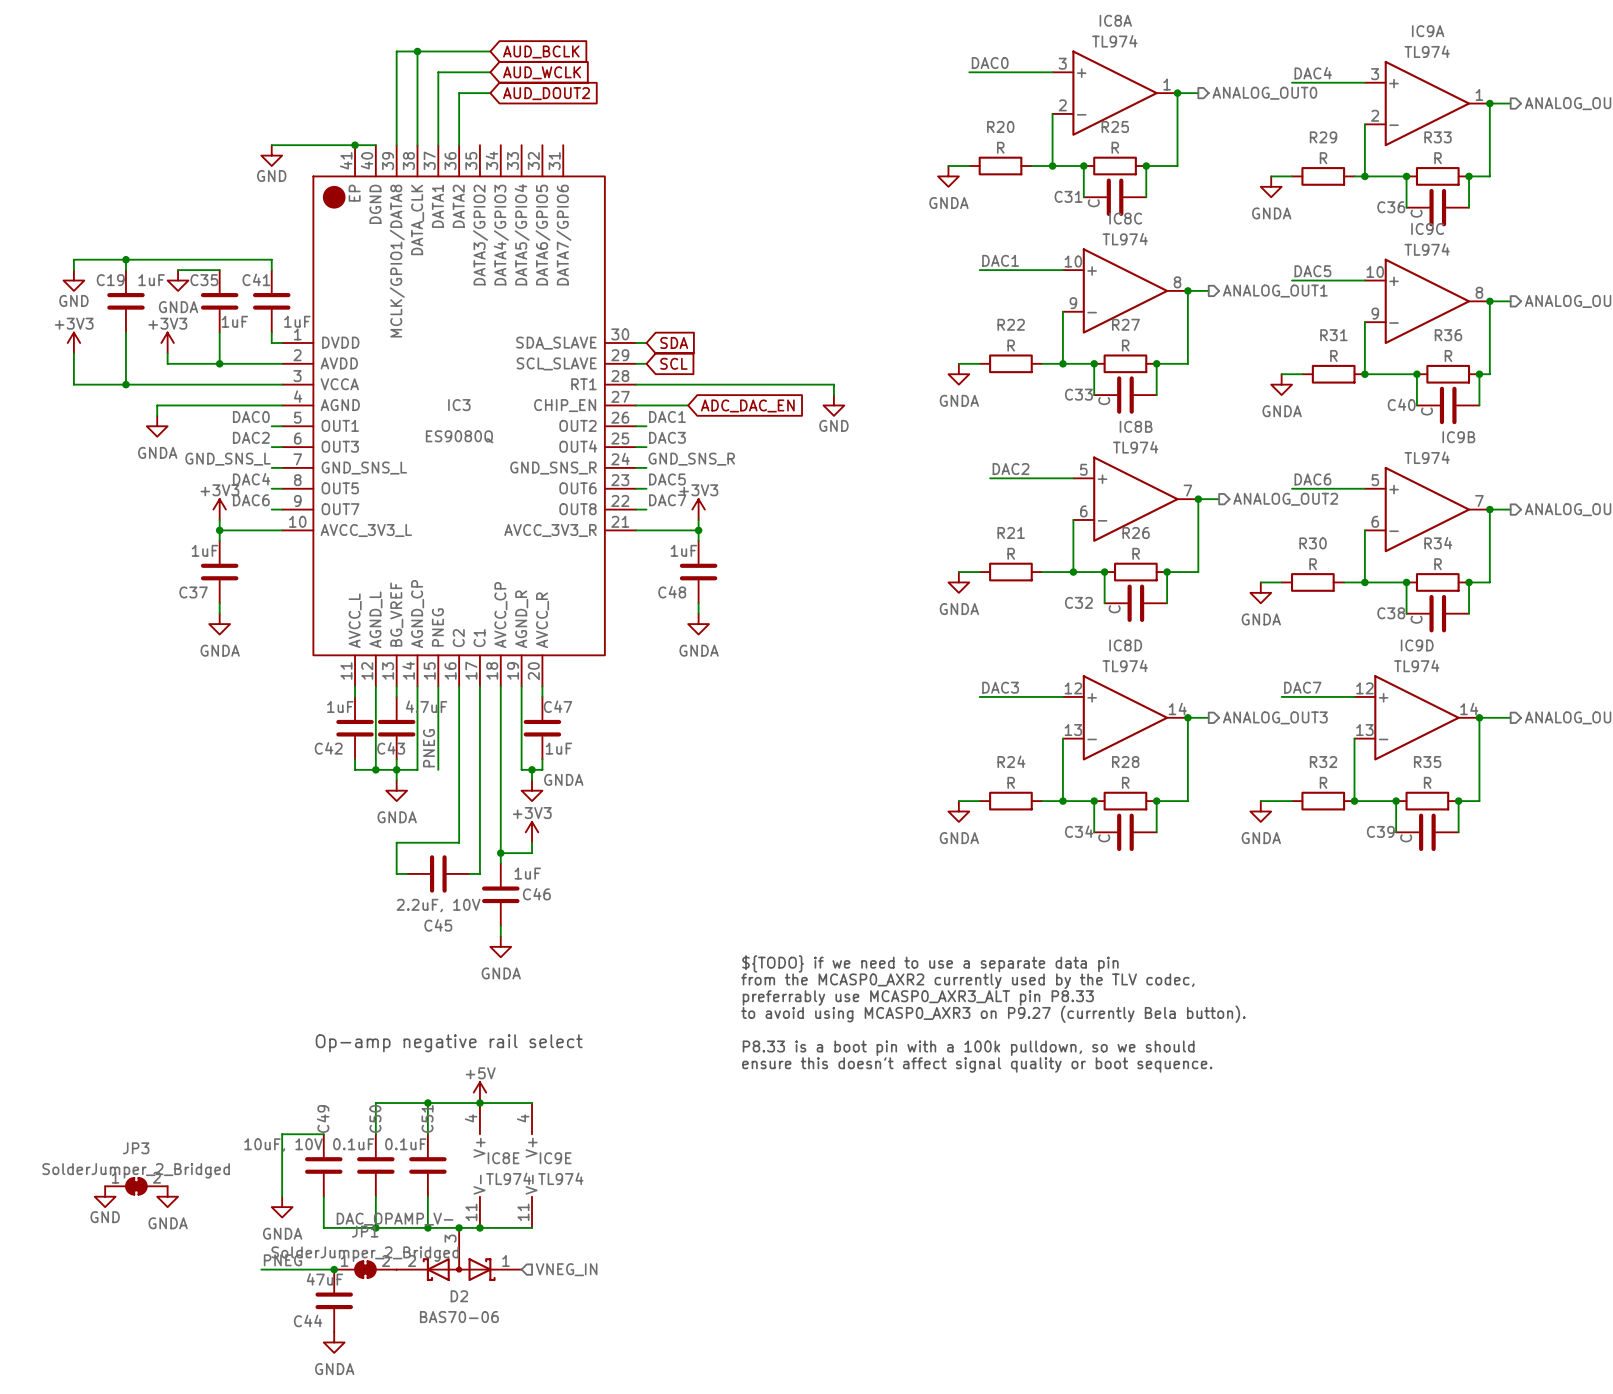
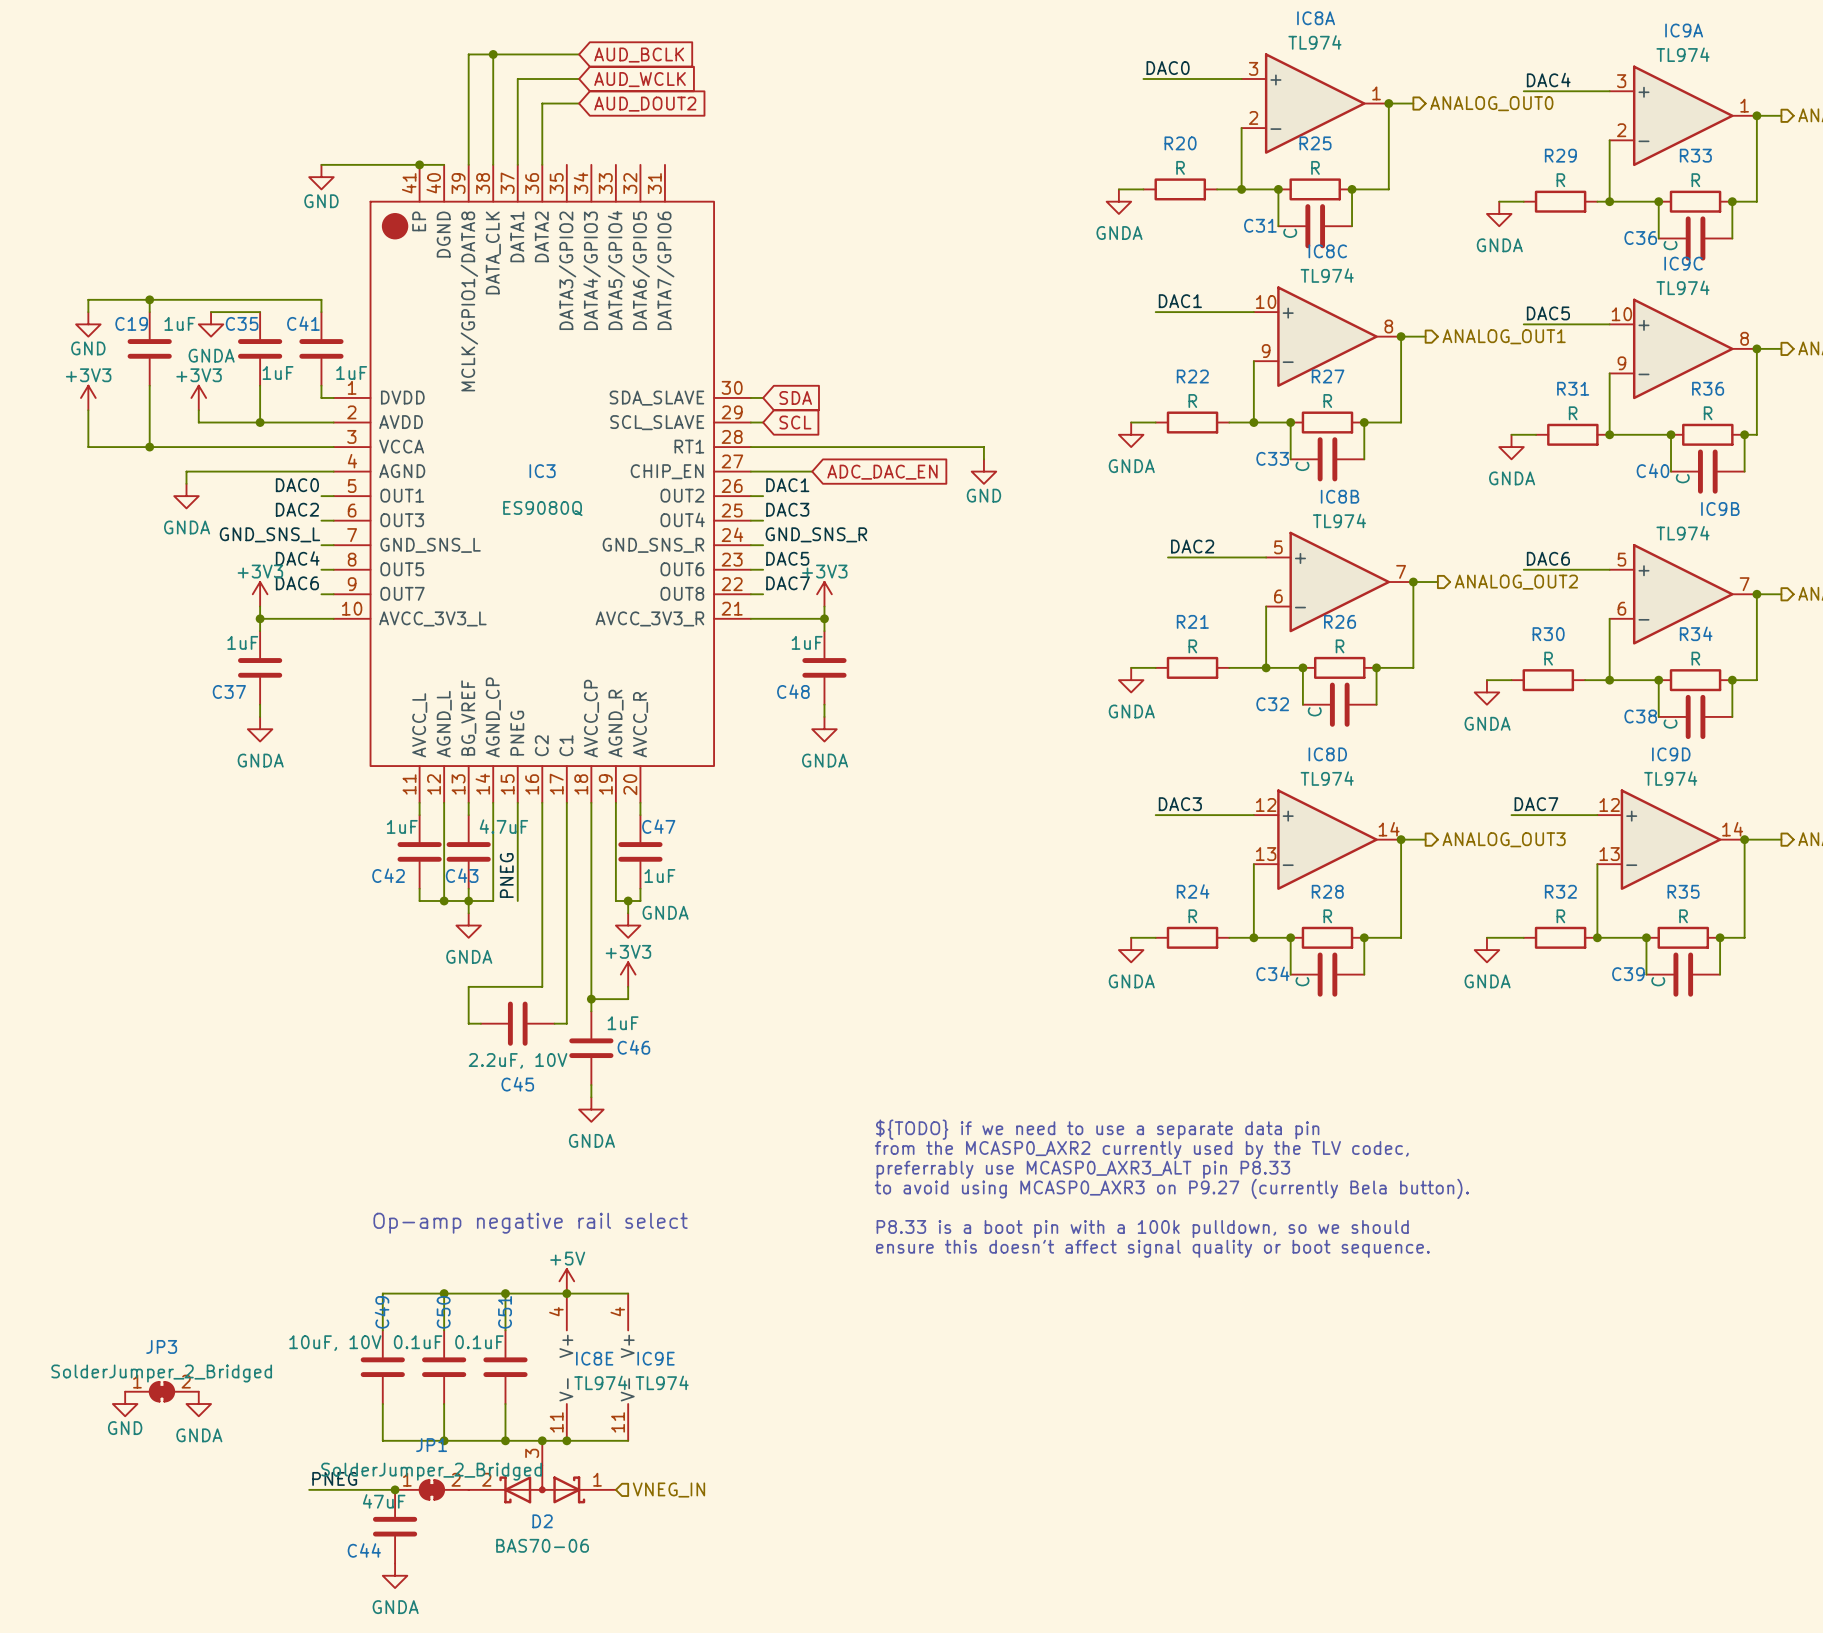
junction: none -> (444, 1293)
wire: (323, 1134) (282, 1134) (282, 1196) -> (382, 1330) (382, 1293) (444, 1293)
power symbol: GNDA (282, 1207) -> none
label: DAC_OPAMP_V- (395, 1219) -> none

